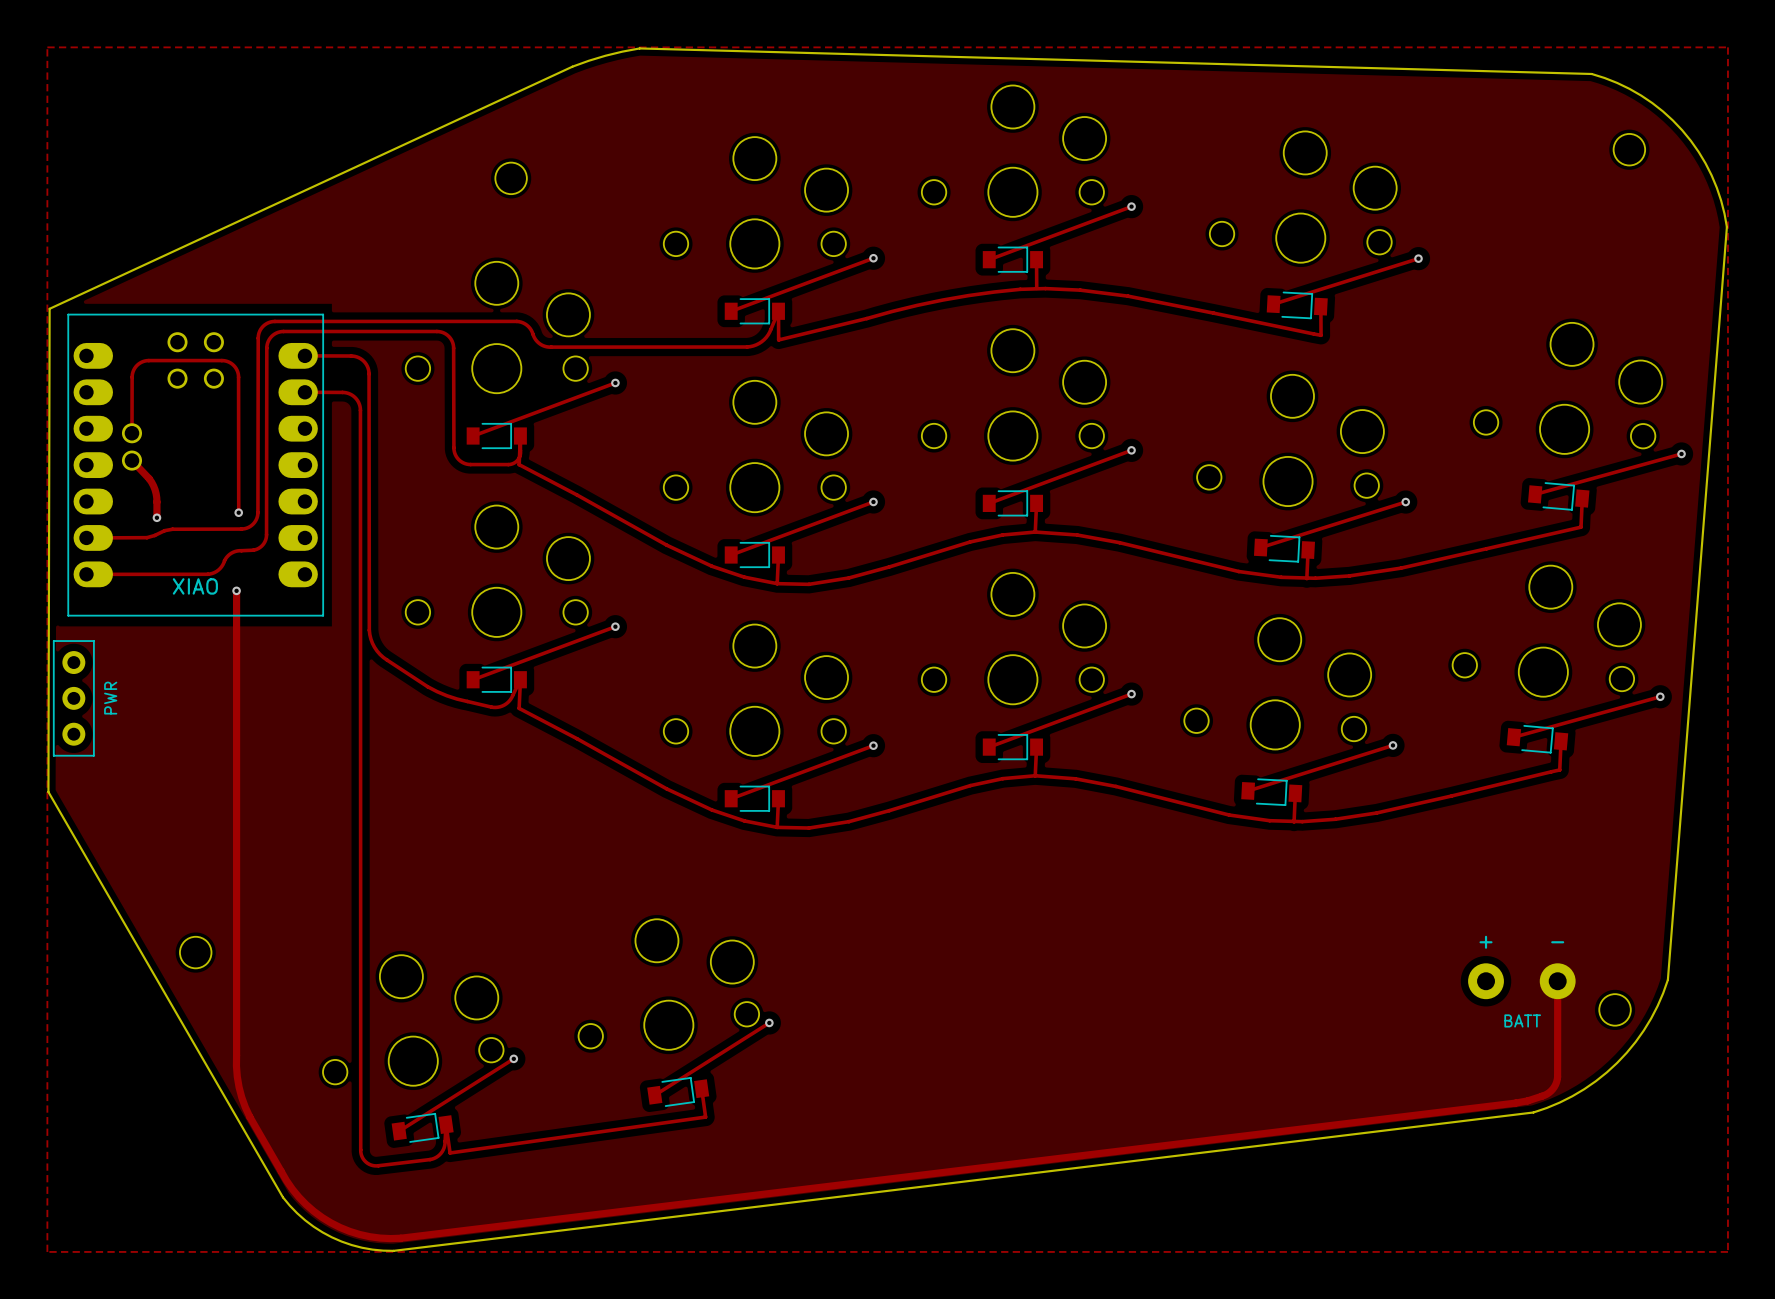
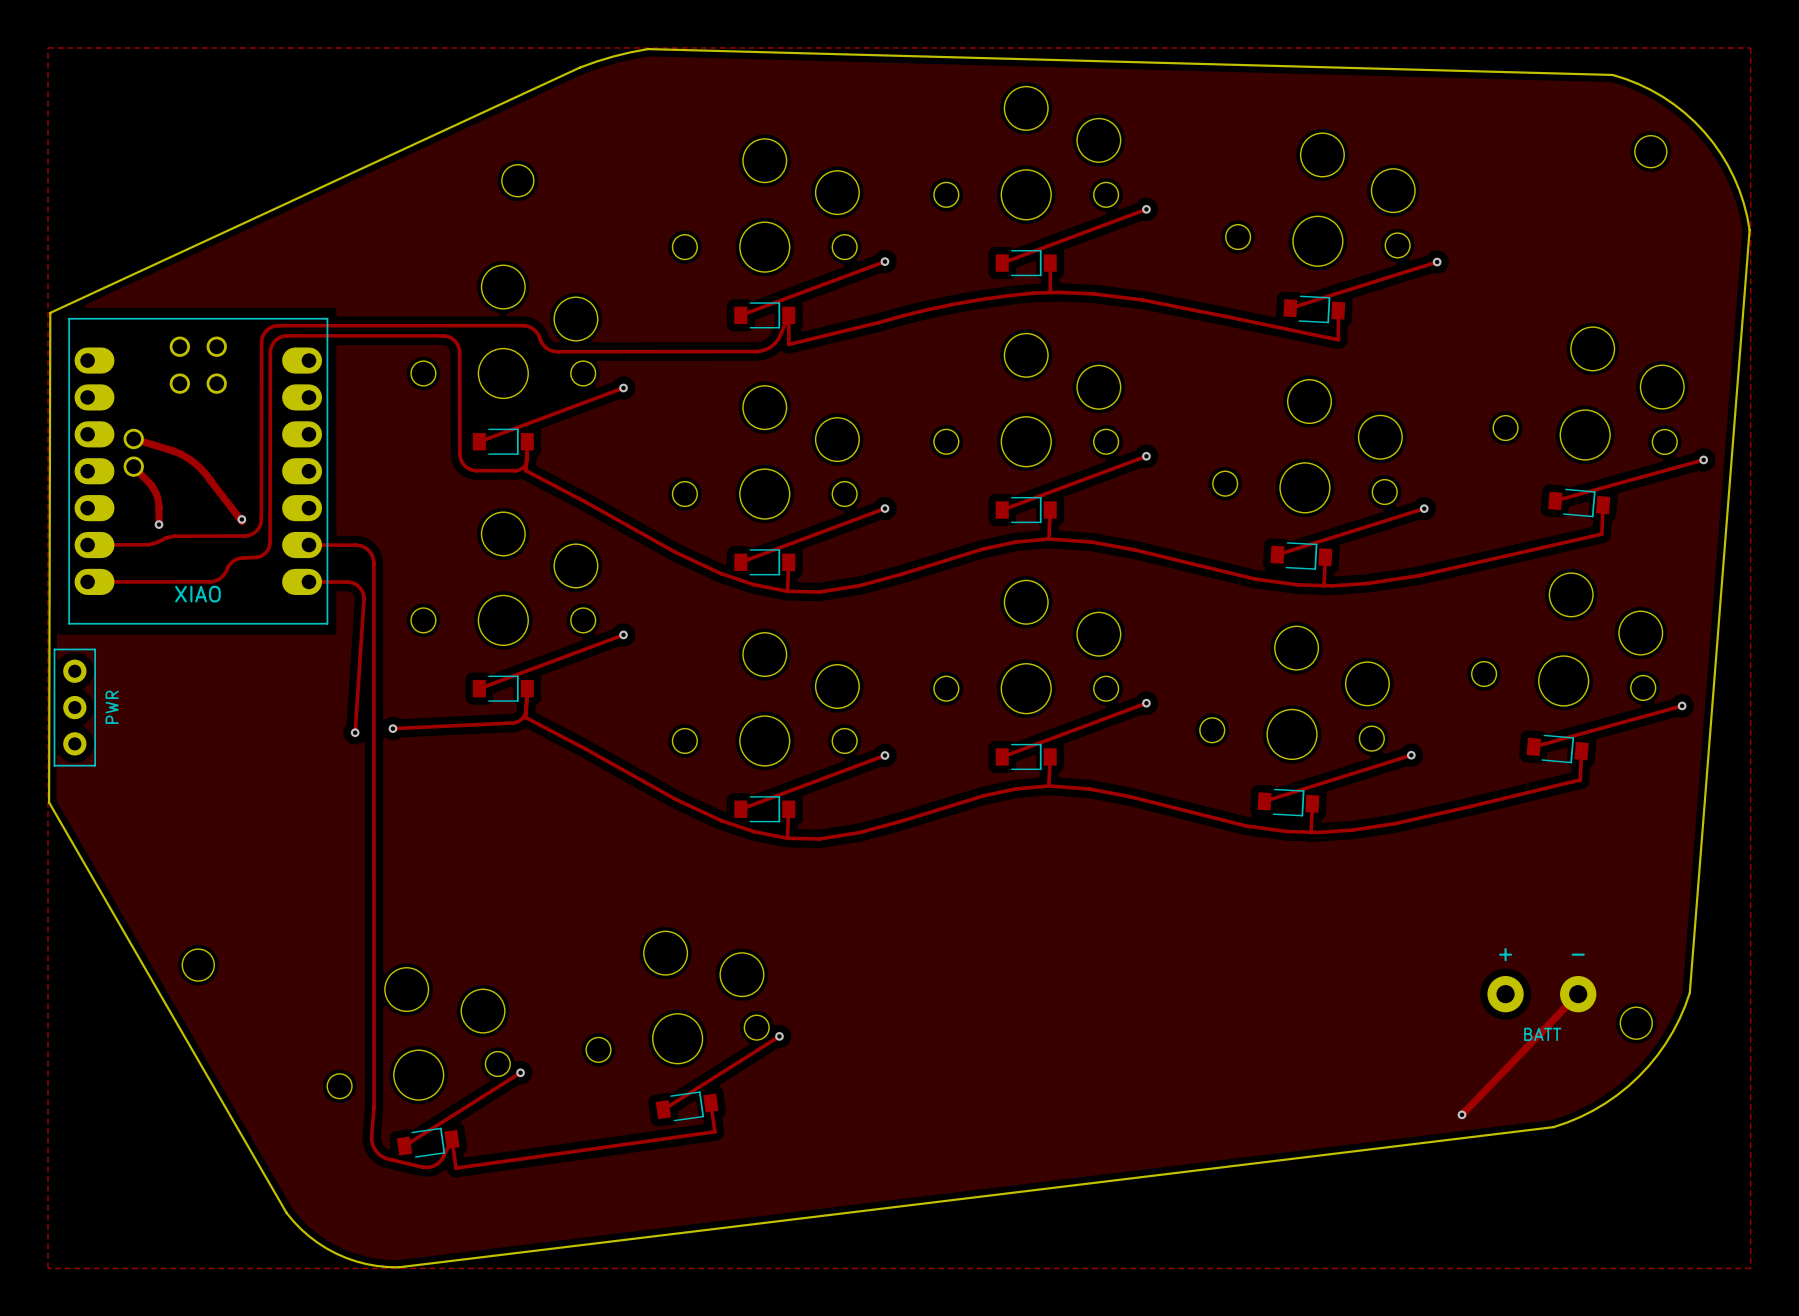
track: (304, 355) (355, 356) (363, 361) (368, 369) (369, 630) (374, 647) (383, 657) (437, 691) (457, 699) (491, 707) (500, 706) (507, 702) (520, 679) -> (392, 728) (516, 722) (525, 713) (527, 688)
track: (304, 392) (348, 393) (356, 399) (360, 408) (361, 1155) (367, 1163) (374, 1165) (434, 1158) (439, 1154) (444, 1147) (446, 1124) -> (308, 545) (359, 545) (368, 550) (373, 561) (374, 1107) (372, 1141) (376, 1151) (385, 1158) (427, 1167) (433, 1166) (440, 1160) (451, 1139)
track: (131, 433) (132, 375) (134, 368) (139, 363) (148, 360) (221, 360) (232, 364) (236, 370) (238, 377) (238, 512) -> (133, 438) (173, 450) (194, 462) (205, 474) (242, 521)
track: none -> (308, 581) (350, 582) (359, 587) (363, 594) (355, 732)
track: (236, 590) (236, 1066) (239, 1087) (249, 1117) (286, 1180) (298, 1197) (313, 1211) (331, 1222) (359, 1234) (380, 1238) (400, 1238) (1527, 1100) (1548, 1092) (1557, 1079) (1557, 981) -> (1461, 1114) (1578, 994)
via: (236, 590) -> none
via: none -> (392, 728)
via: none -> (355, 732)
via: none -> (1461, 1114)

